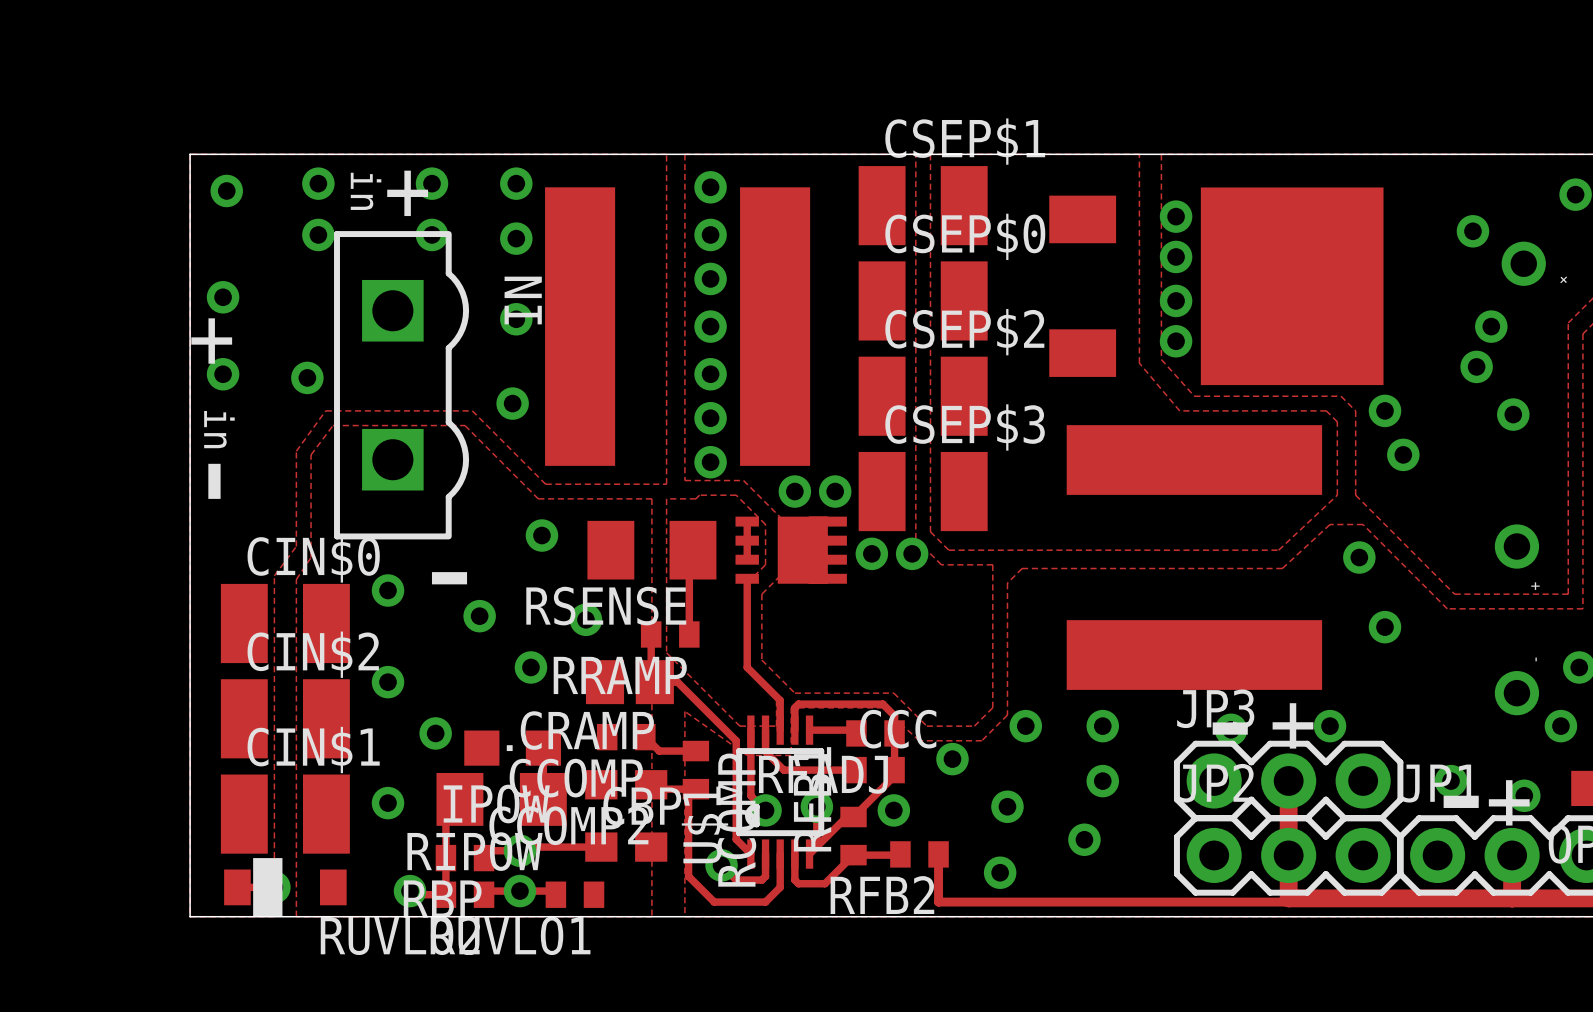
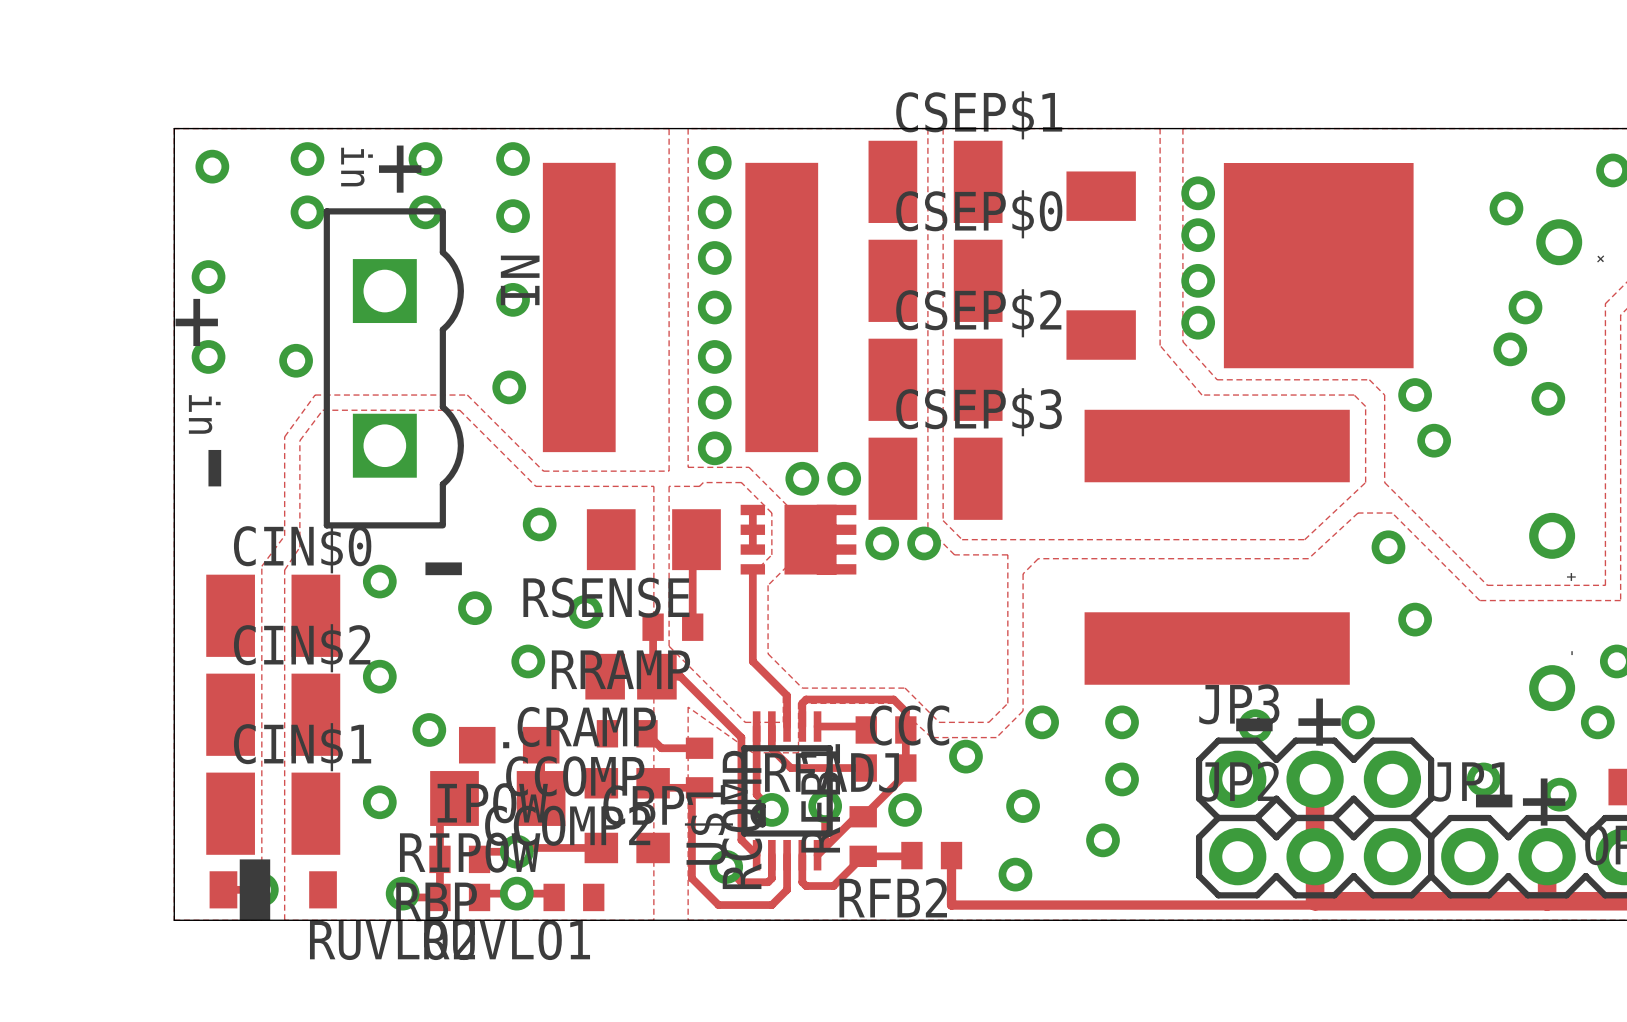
text position: - (214, 481) -> - (214, 468)

